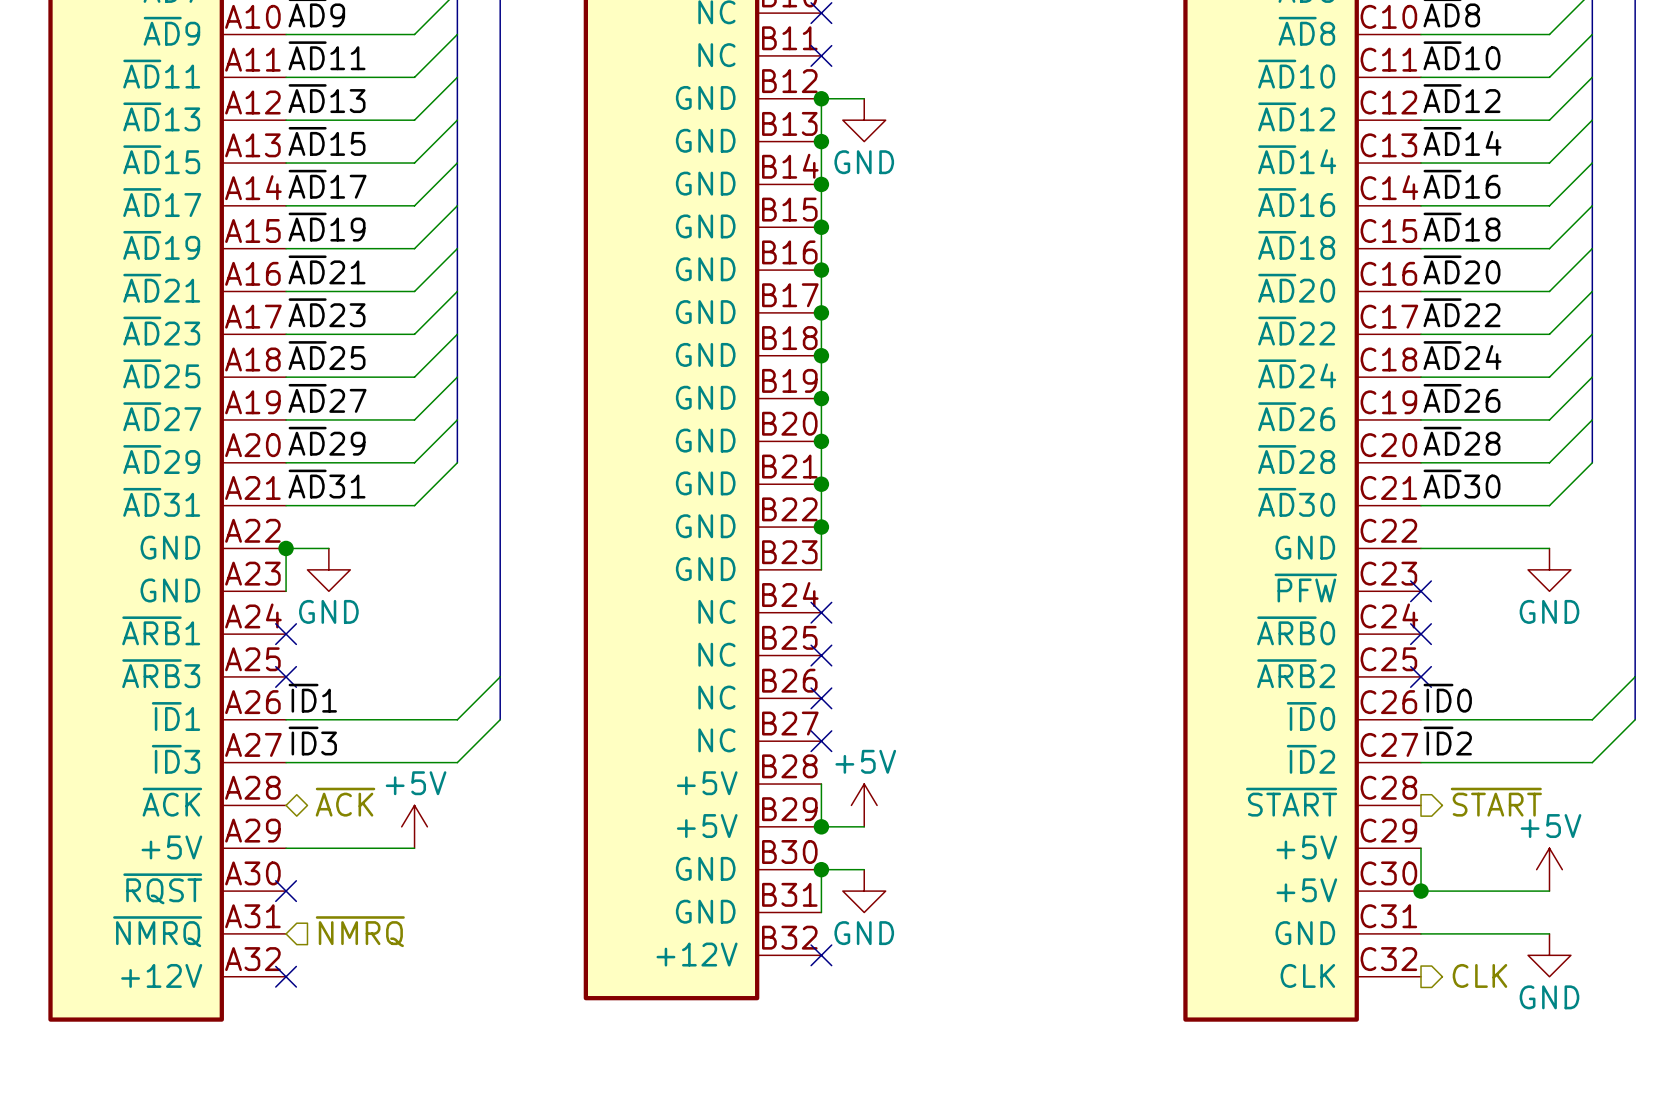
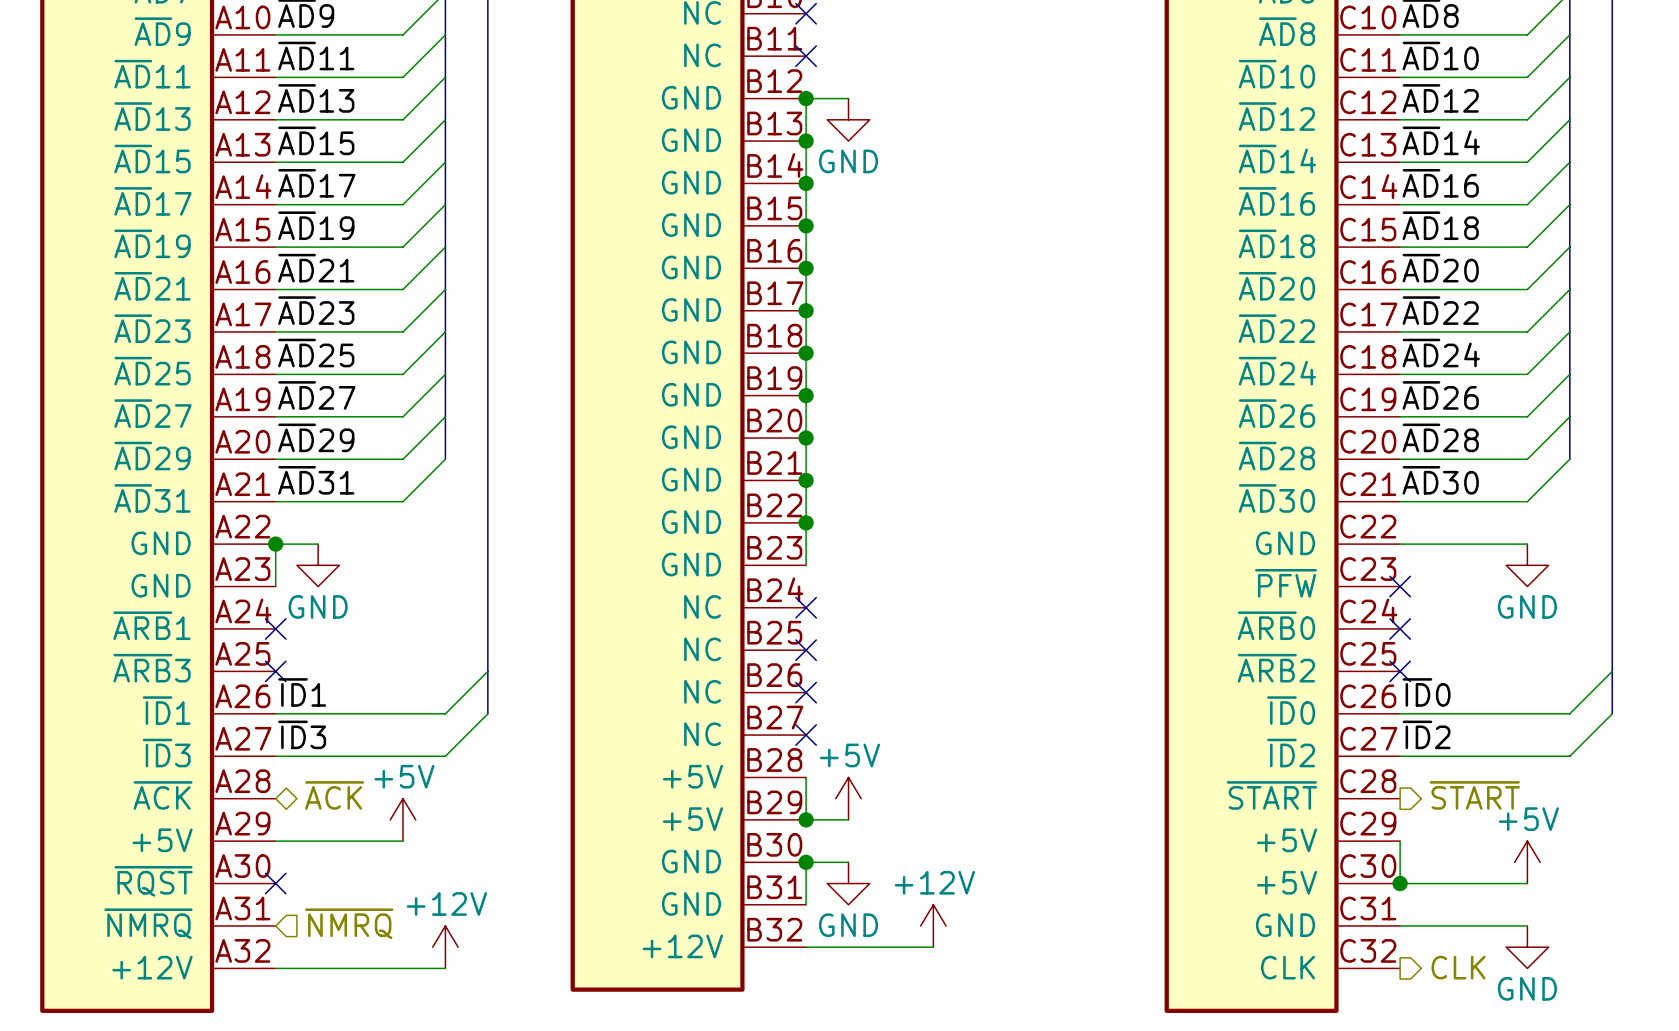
power symbol: none -> +12V (933, 925)
power symbol: none -> +12V (445, 947)
wire: none -> (806, 947) (933, 947)
no-connect mark: (821, 955) -> none
wire: none -> (275, 968) (445, 968)
no-connect mark: (286, 976) -> none

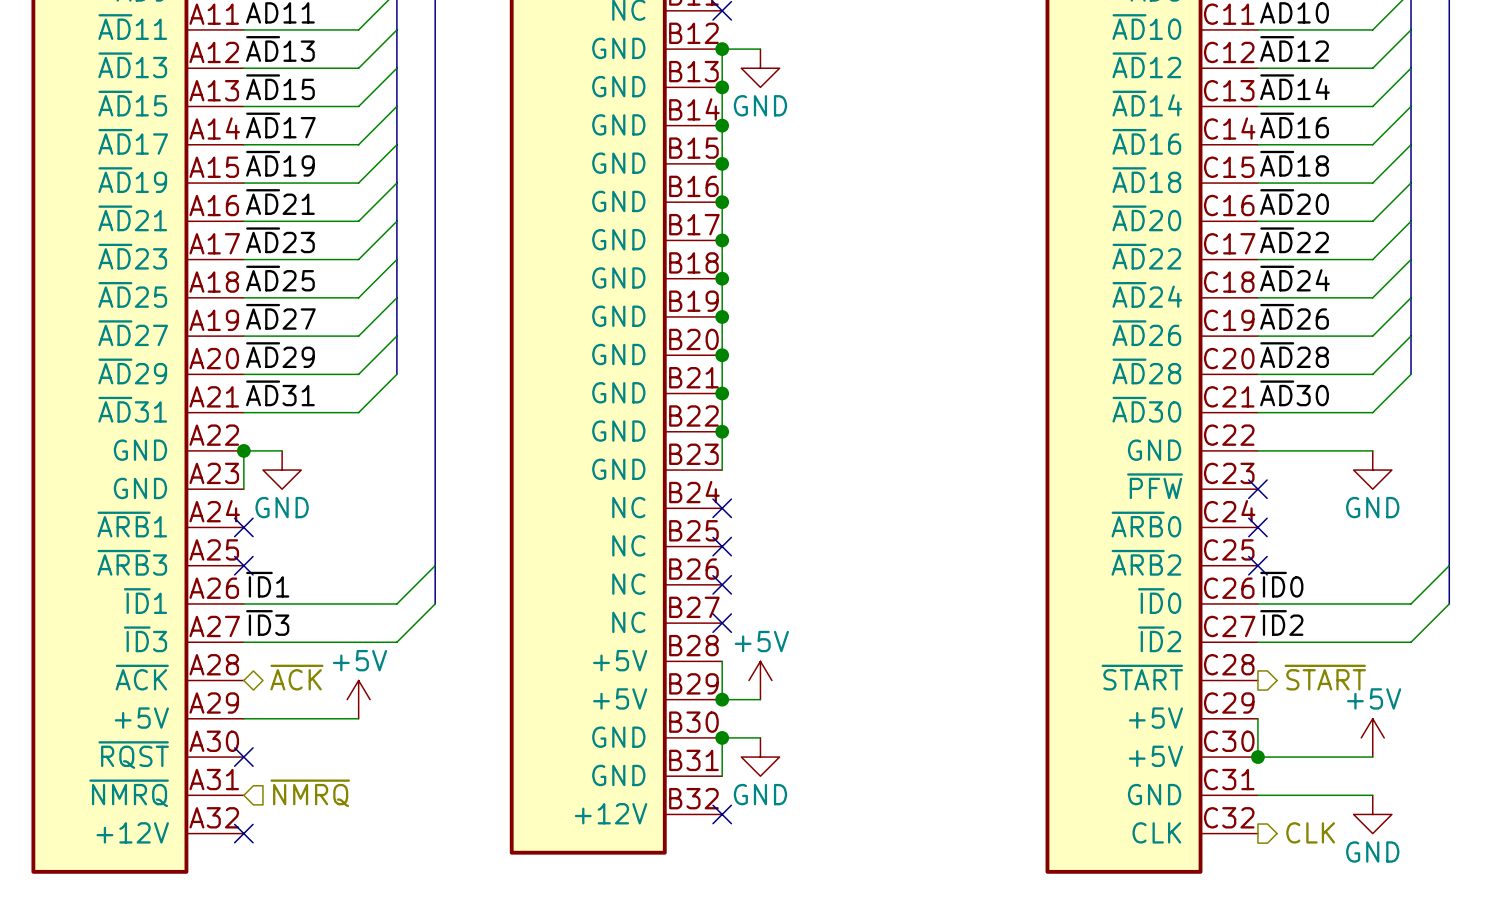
power symbol: +12V (933, 925) -> none
power symbol: +12V (445, 947) -> none
wire: (806, 947) (933, 947) -> none
no-connect mark: none -> (722, 814)
wire: (275, 968) (445, 968) -> none
no-connect mark: none -> (243, 833)

